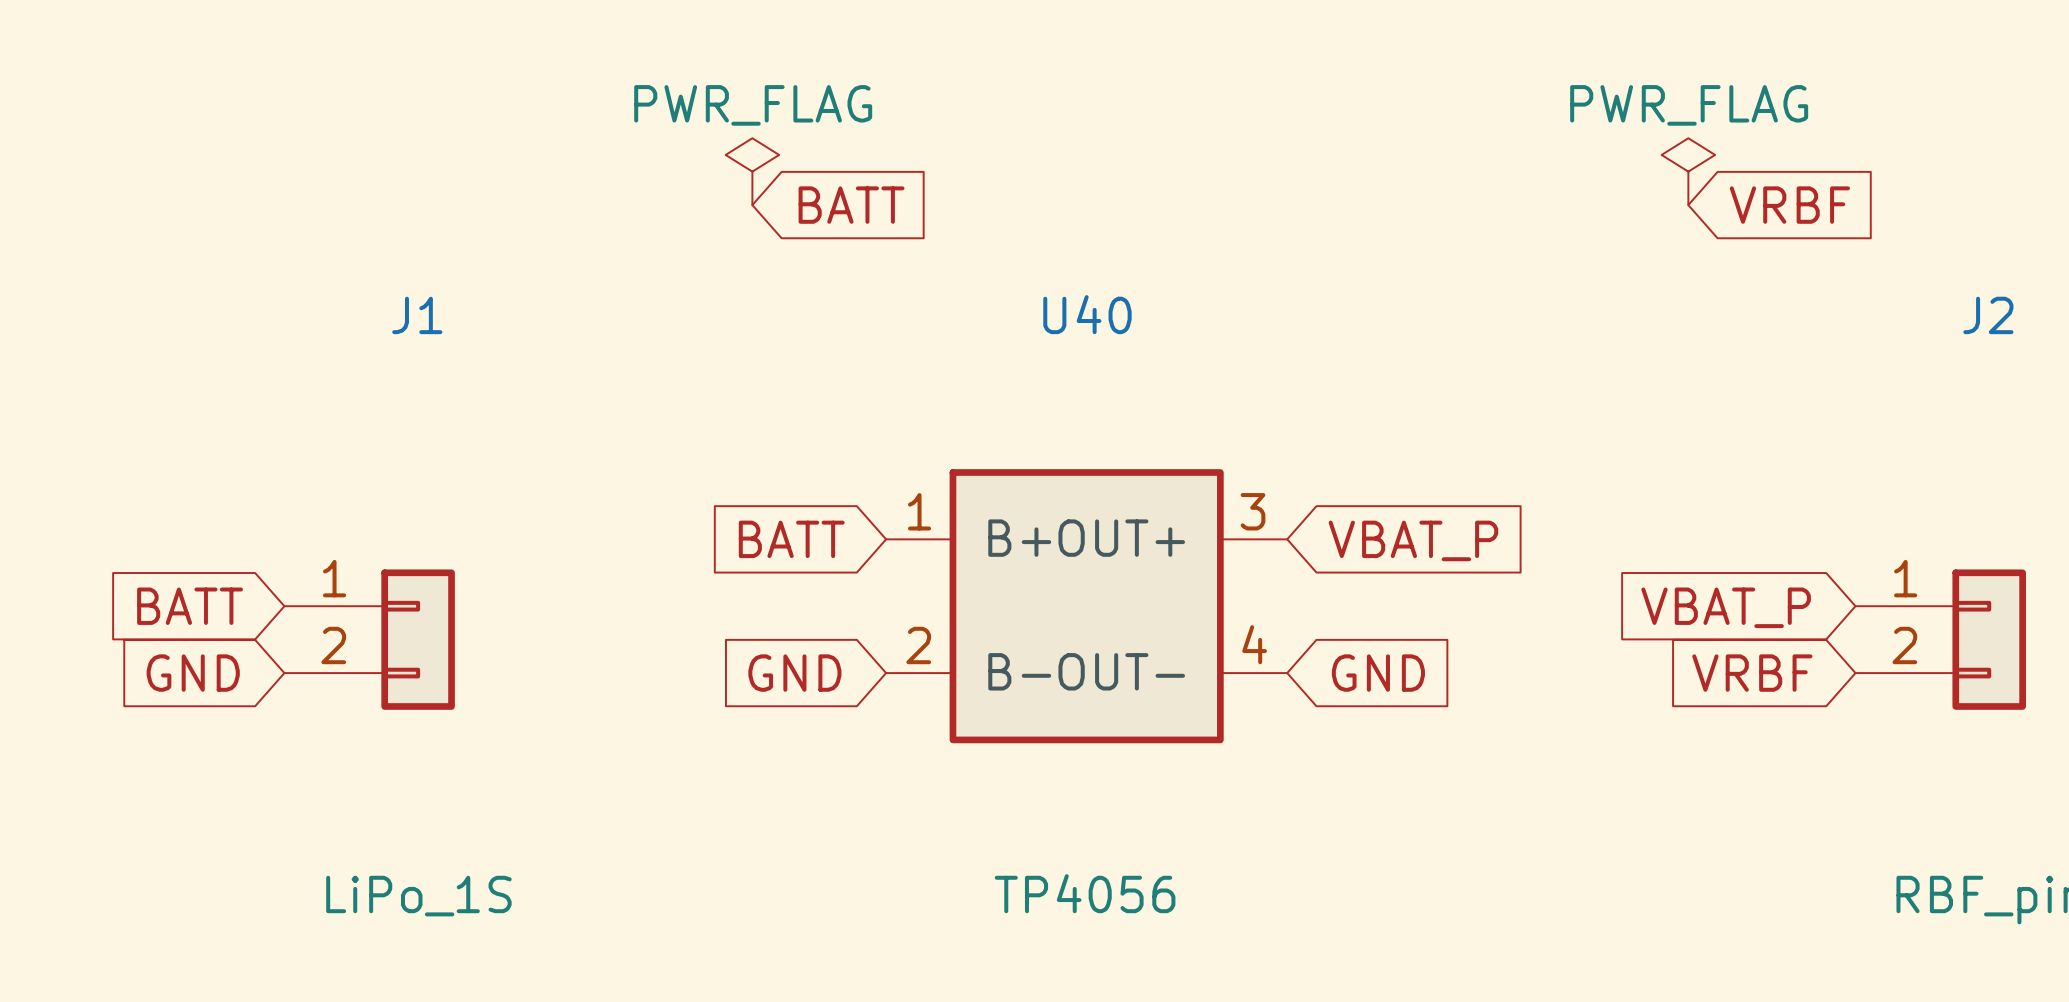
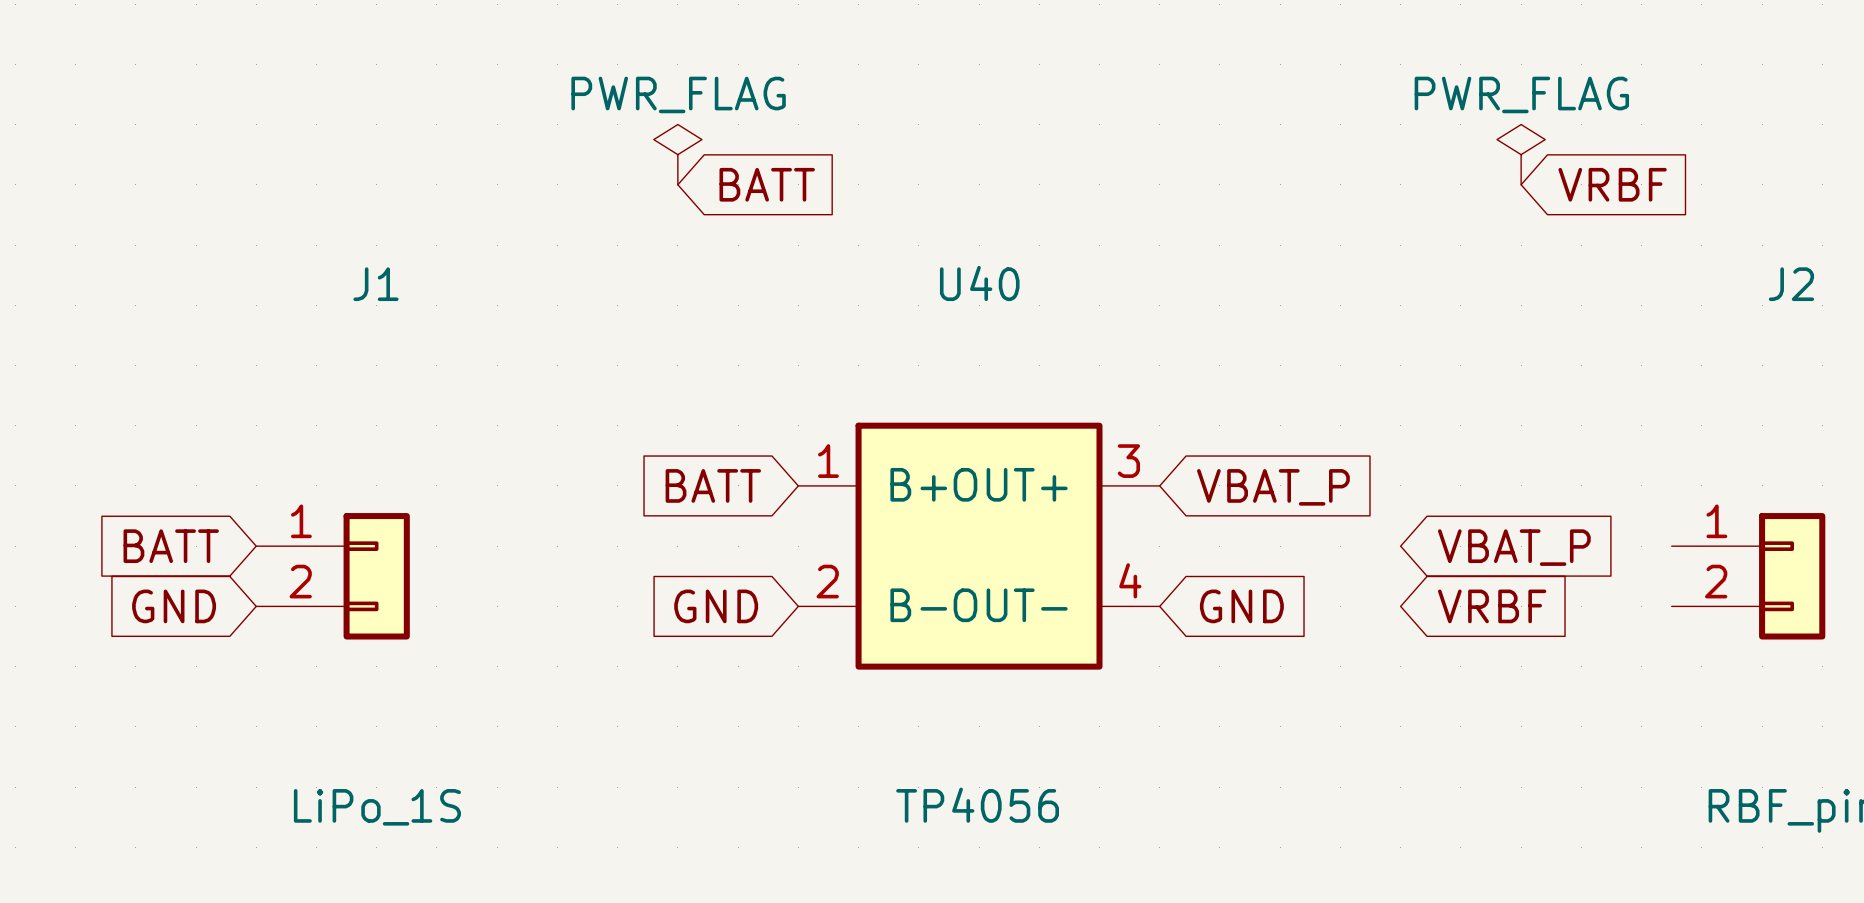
global label rotation: 0° (1726, 607) -> 180° (1514, 547)
global label rotation: 0° (1752, 673) -> 180° (1492, 606)

